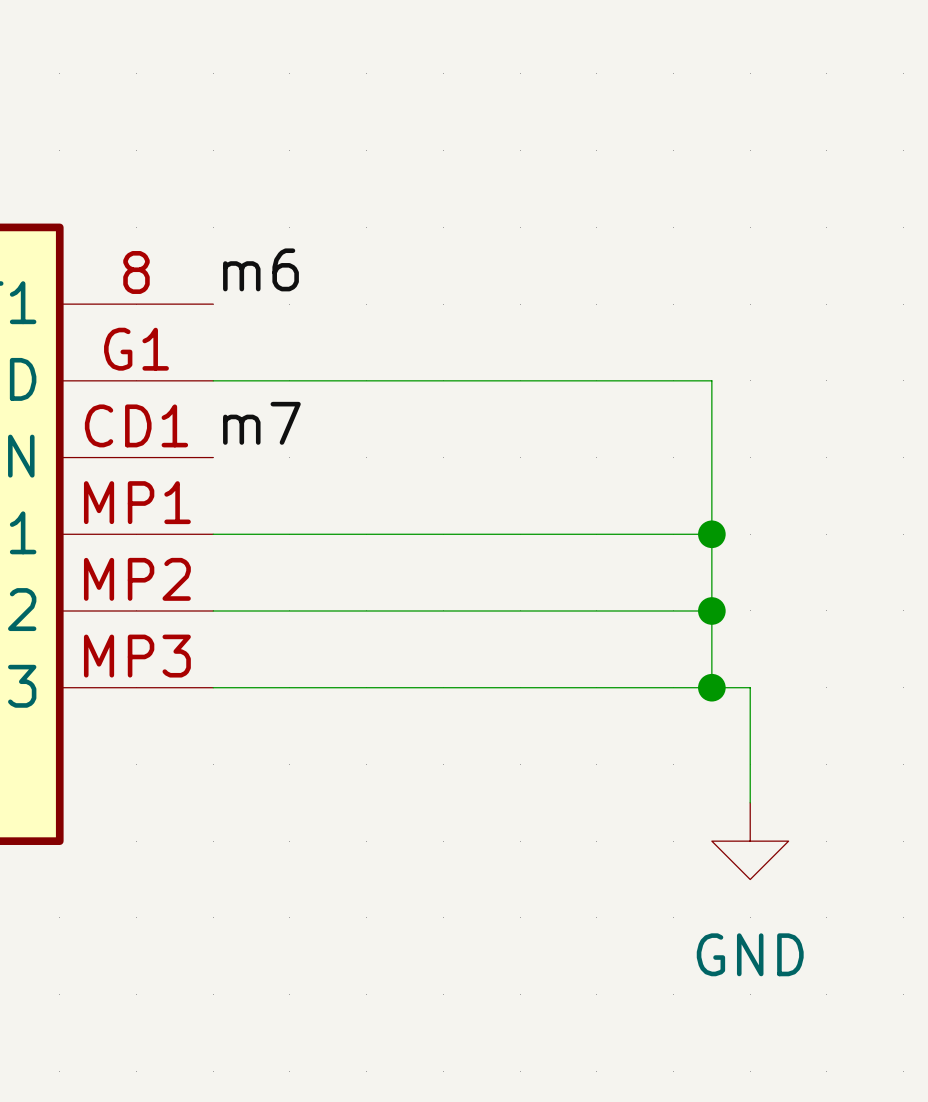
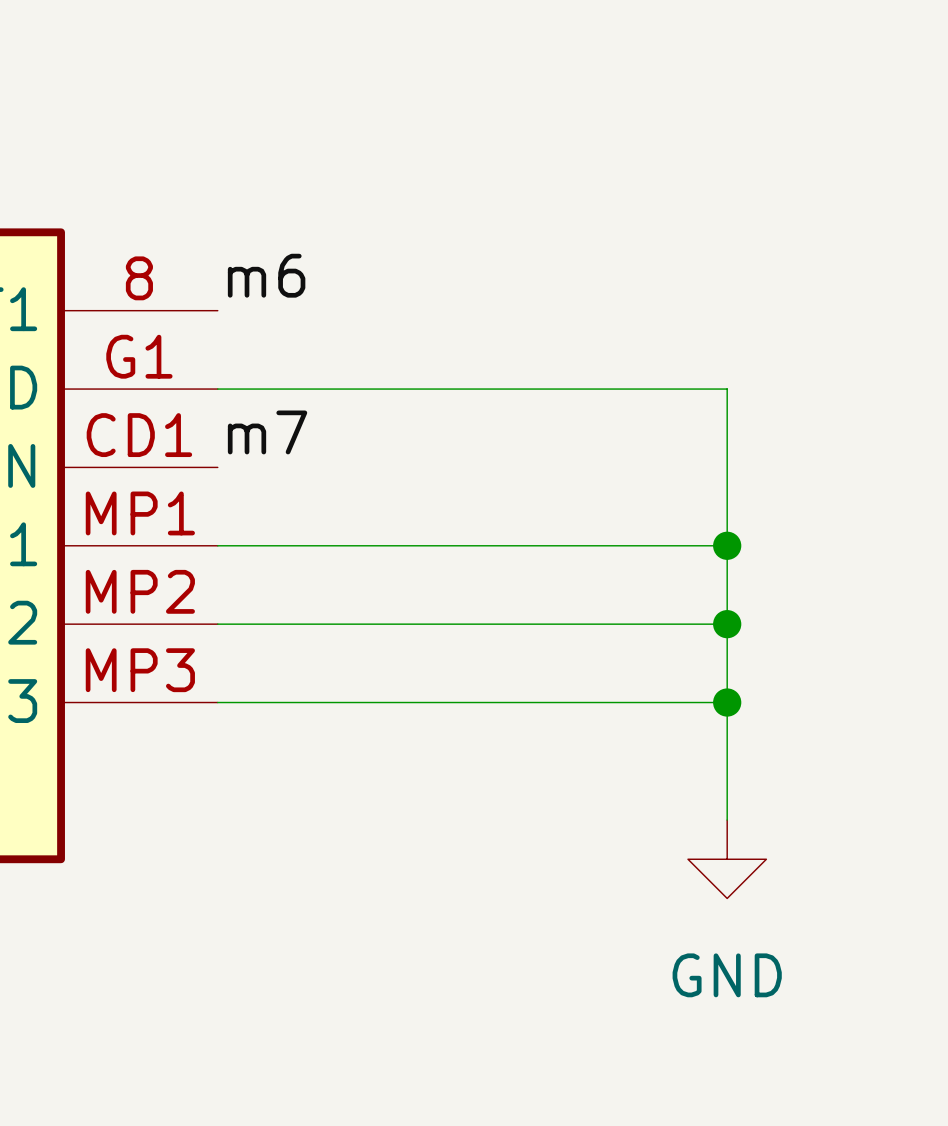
wire: (711, 687) (750, 687) (750, 802) -> (727, 702) (727, 820)
power symbol position: GND (750, 841) -> GND (727, 859)

